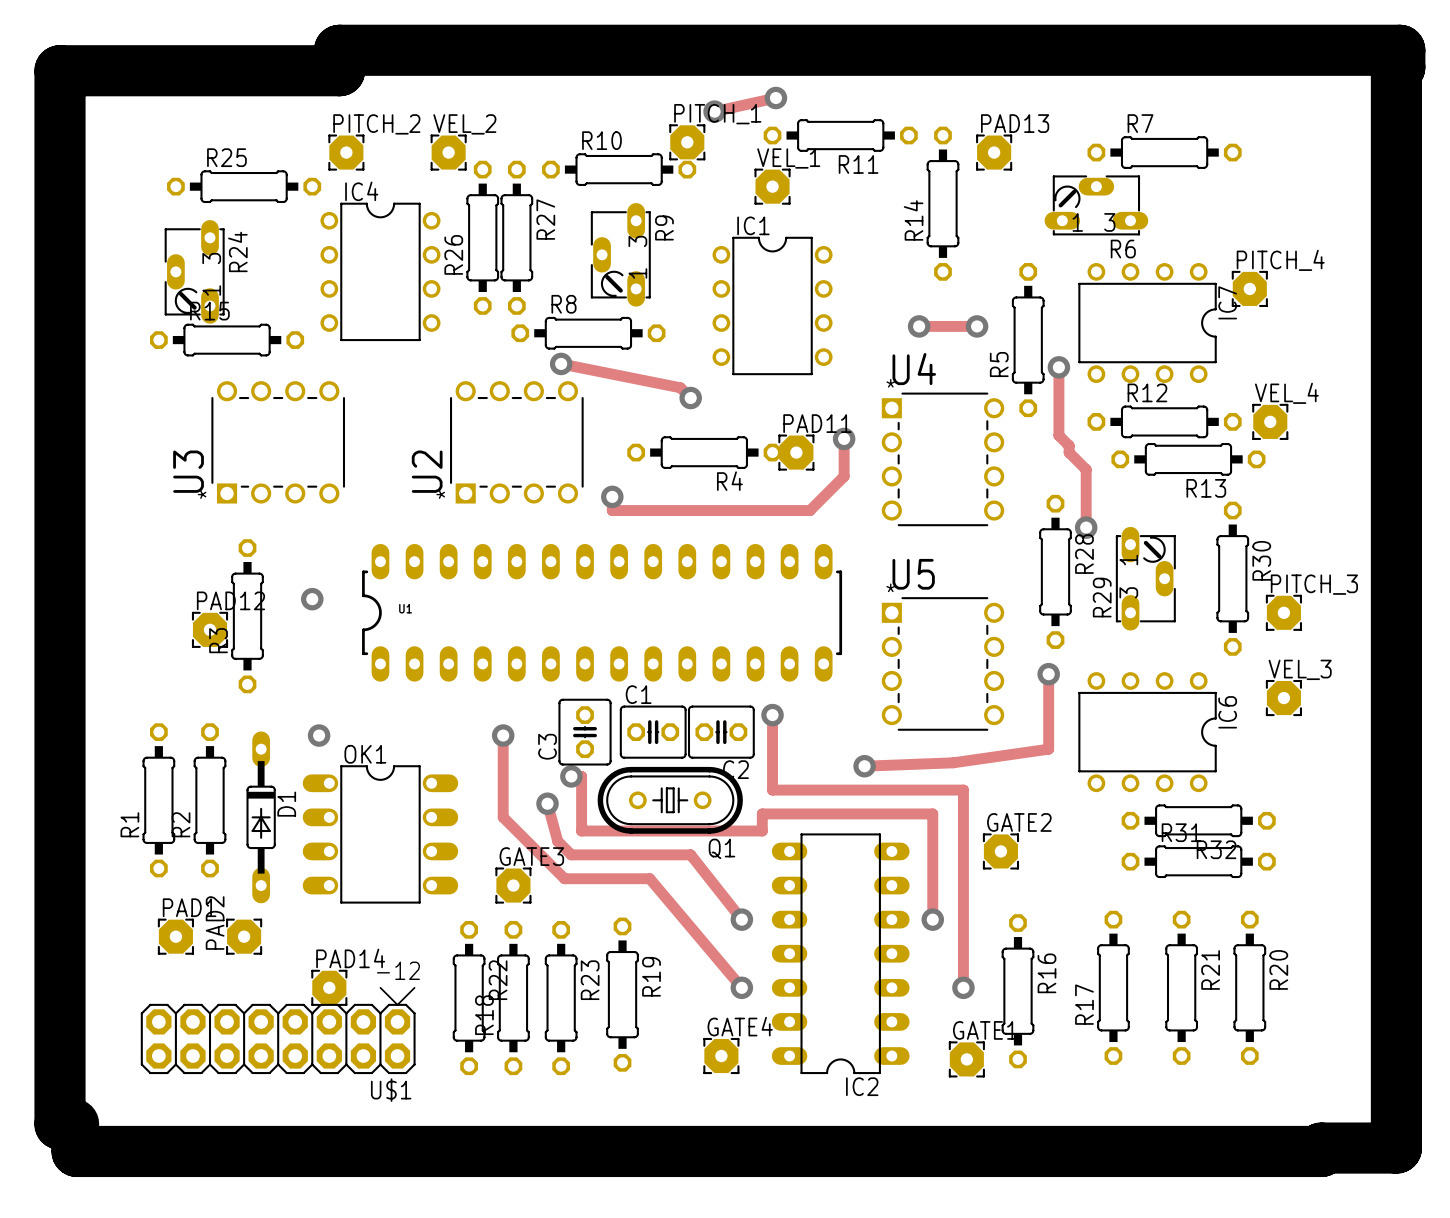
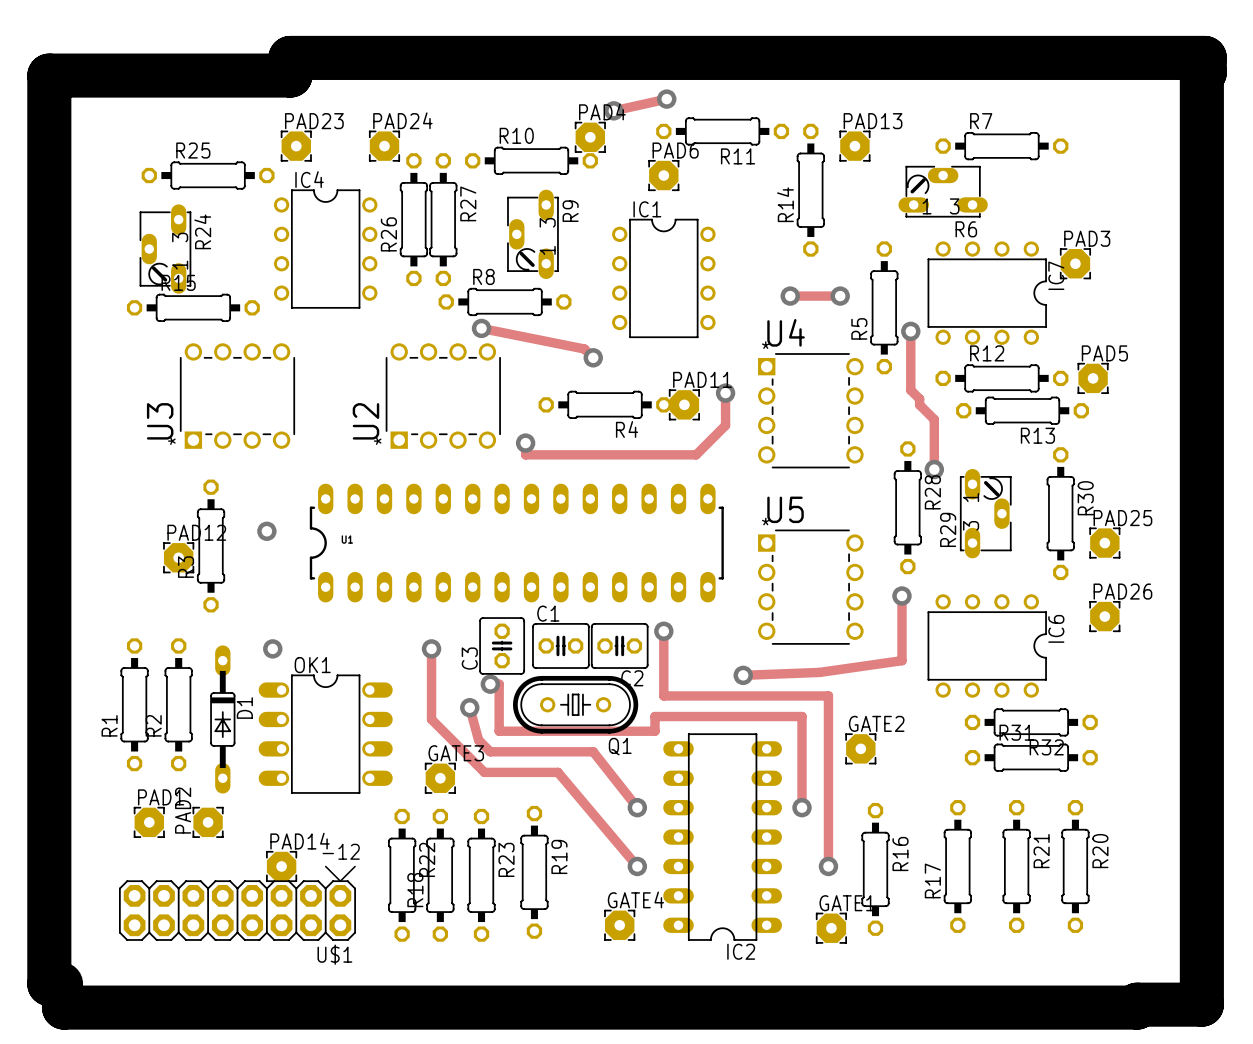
PITCH_1 name: PITCH_1 (717, 114) -> PAD4 (602, 111)
PITCH_2 name: PITCH_2 (376, 124) -> PAD23 (314, 121)
VEL_2 name: VEL_2 (464, 124) -> PAD24 (402, 120)
VEL_1 name: VEL_1 (788, 158) -> PAD6 (675, 150)
PITCH_4 name: PITCH_4 (1280, 260) -> PAD3 (1087, 238)
VEL_4 name: VEL_4 (1286, 393) -> PAD5 (1104, 353)
PITCH_3 name: PITCH_3 (1314, 584) -> PAD25 (1122, 518)
VEL_3 name: VEL_3 (1300, 669) -> PAD26 (1122, 591)

